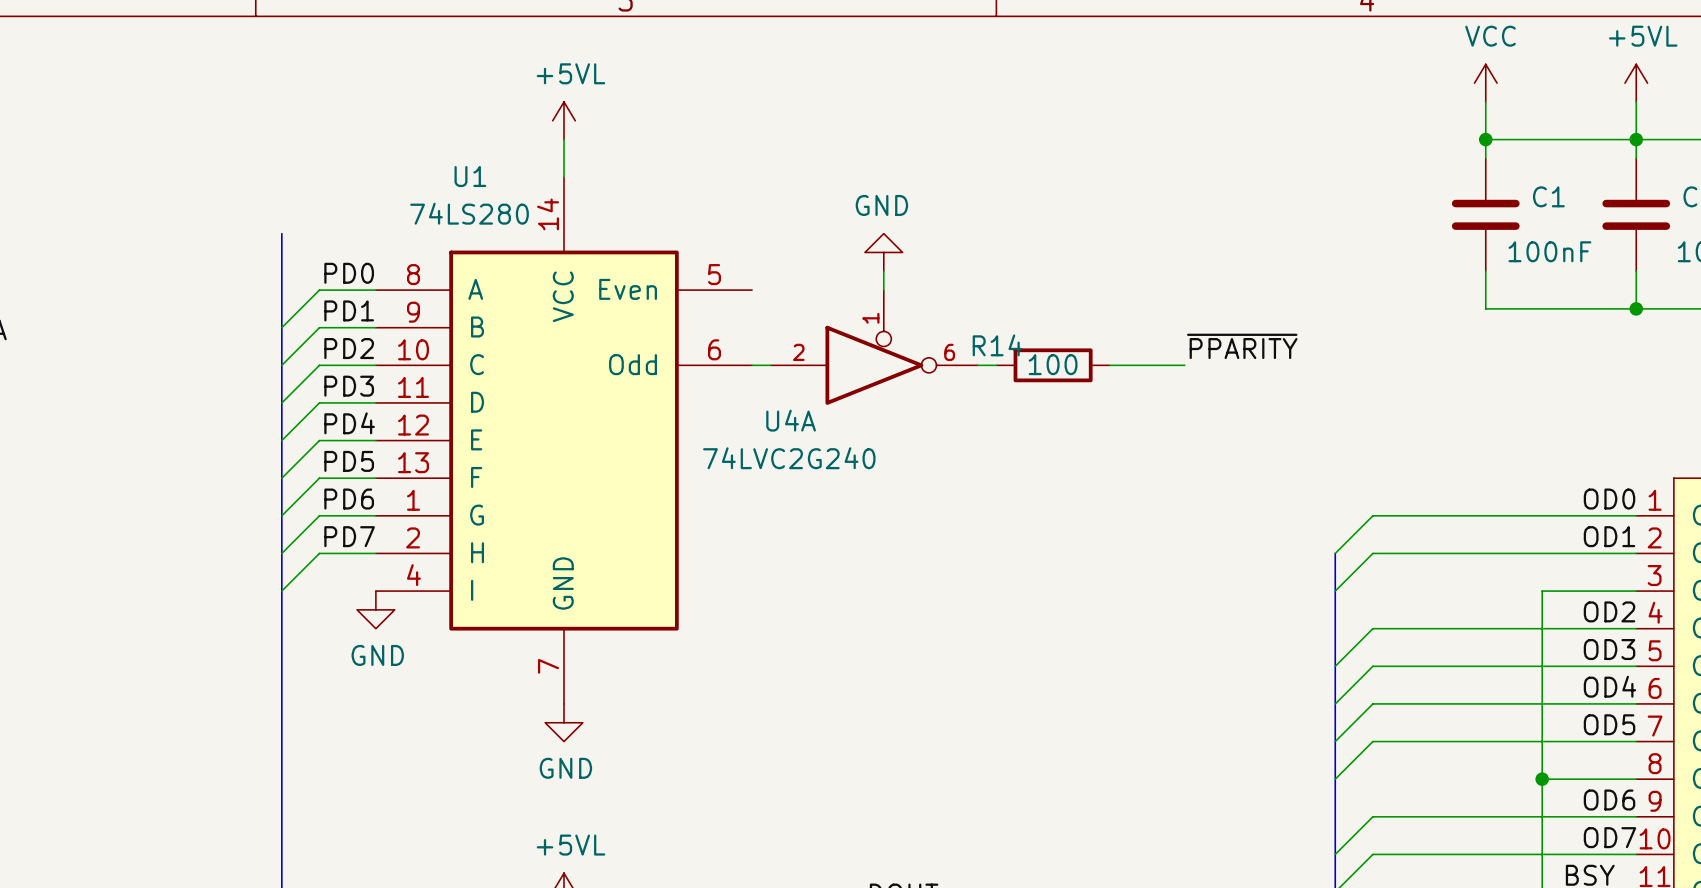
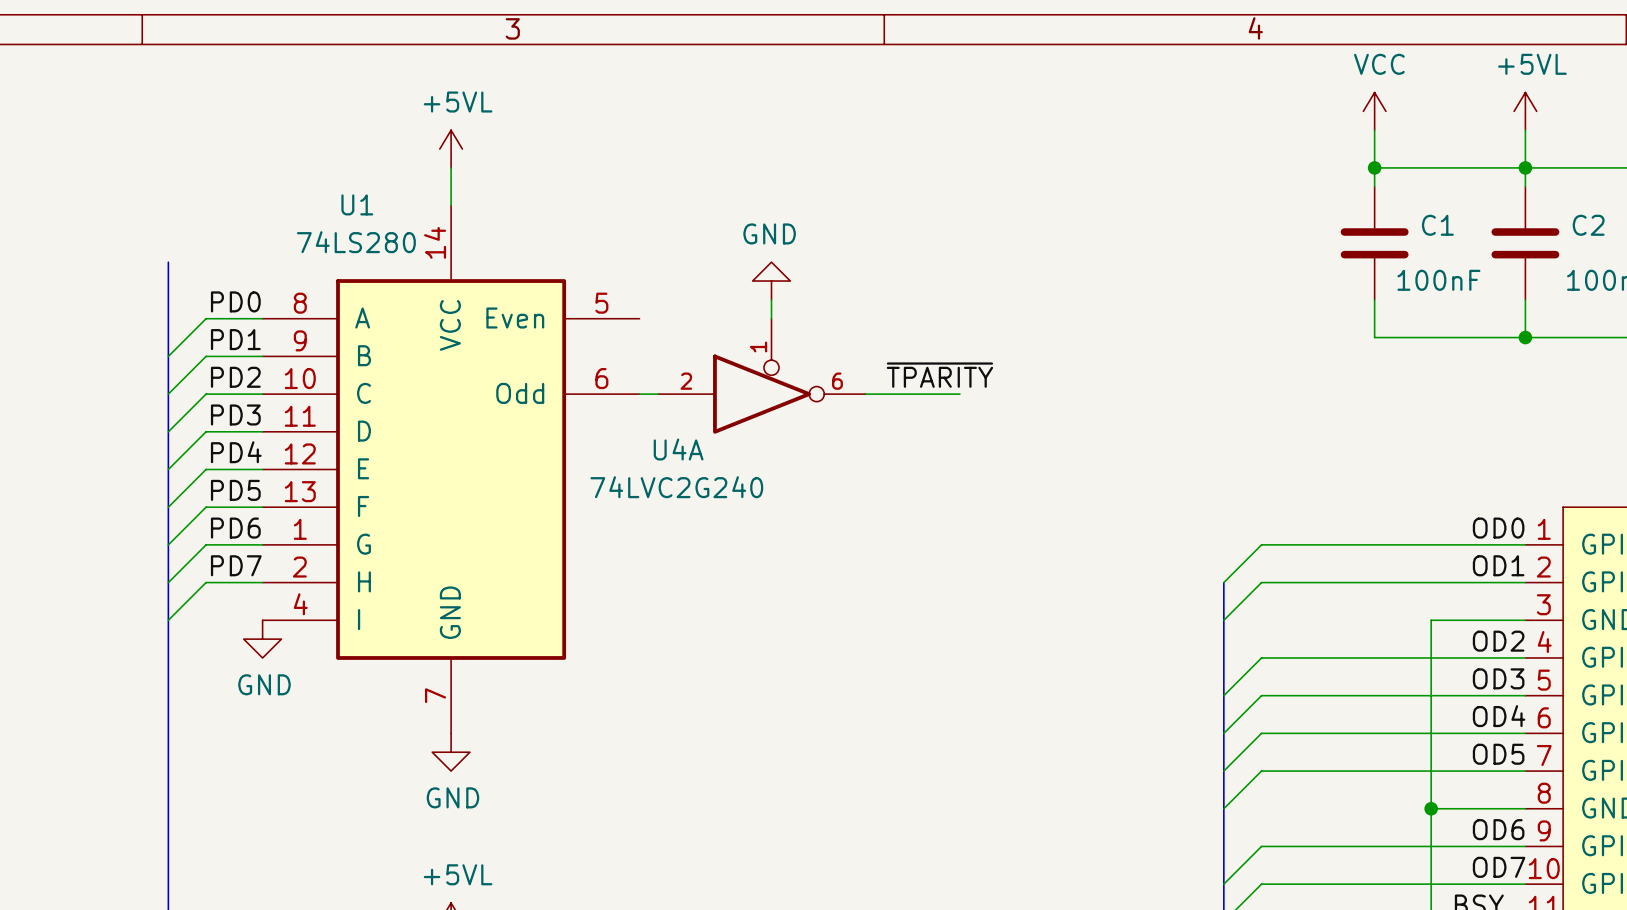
label: ~{PPARITY} (1242, 346) -> ~{TPARITY} (939, 375)
R14: 100 (1053, 365) -> none
wire: (1109, 365) (1184, 365) -> (884, 394) (959, 394)

